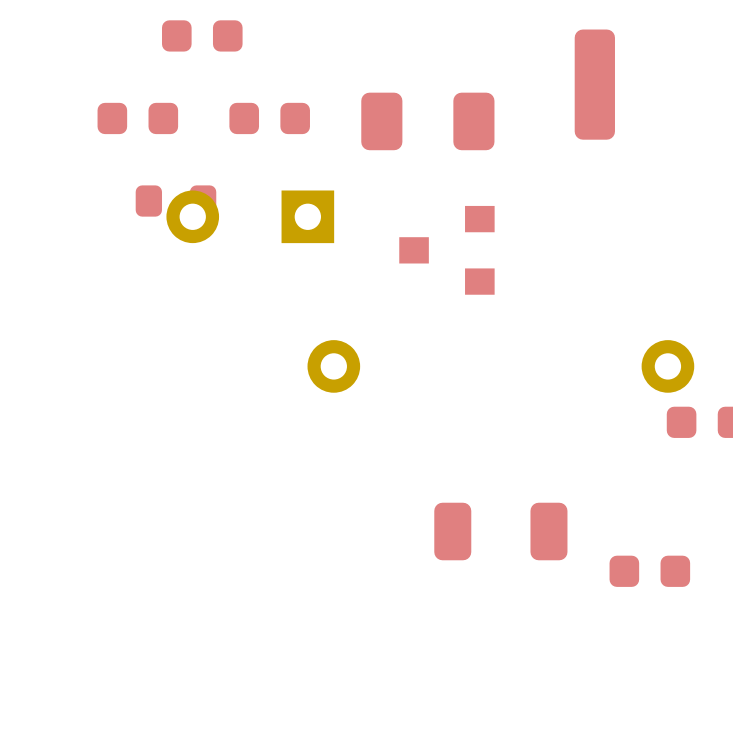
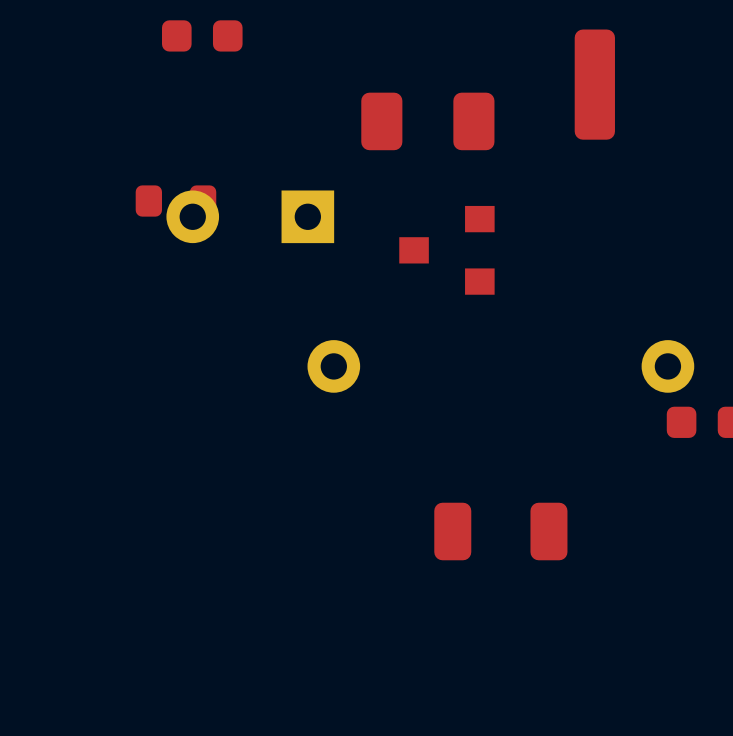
part: (137, 118) -> none
part: (269, 118) -> none
part: (649, 571) -> none

